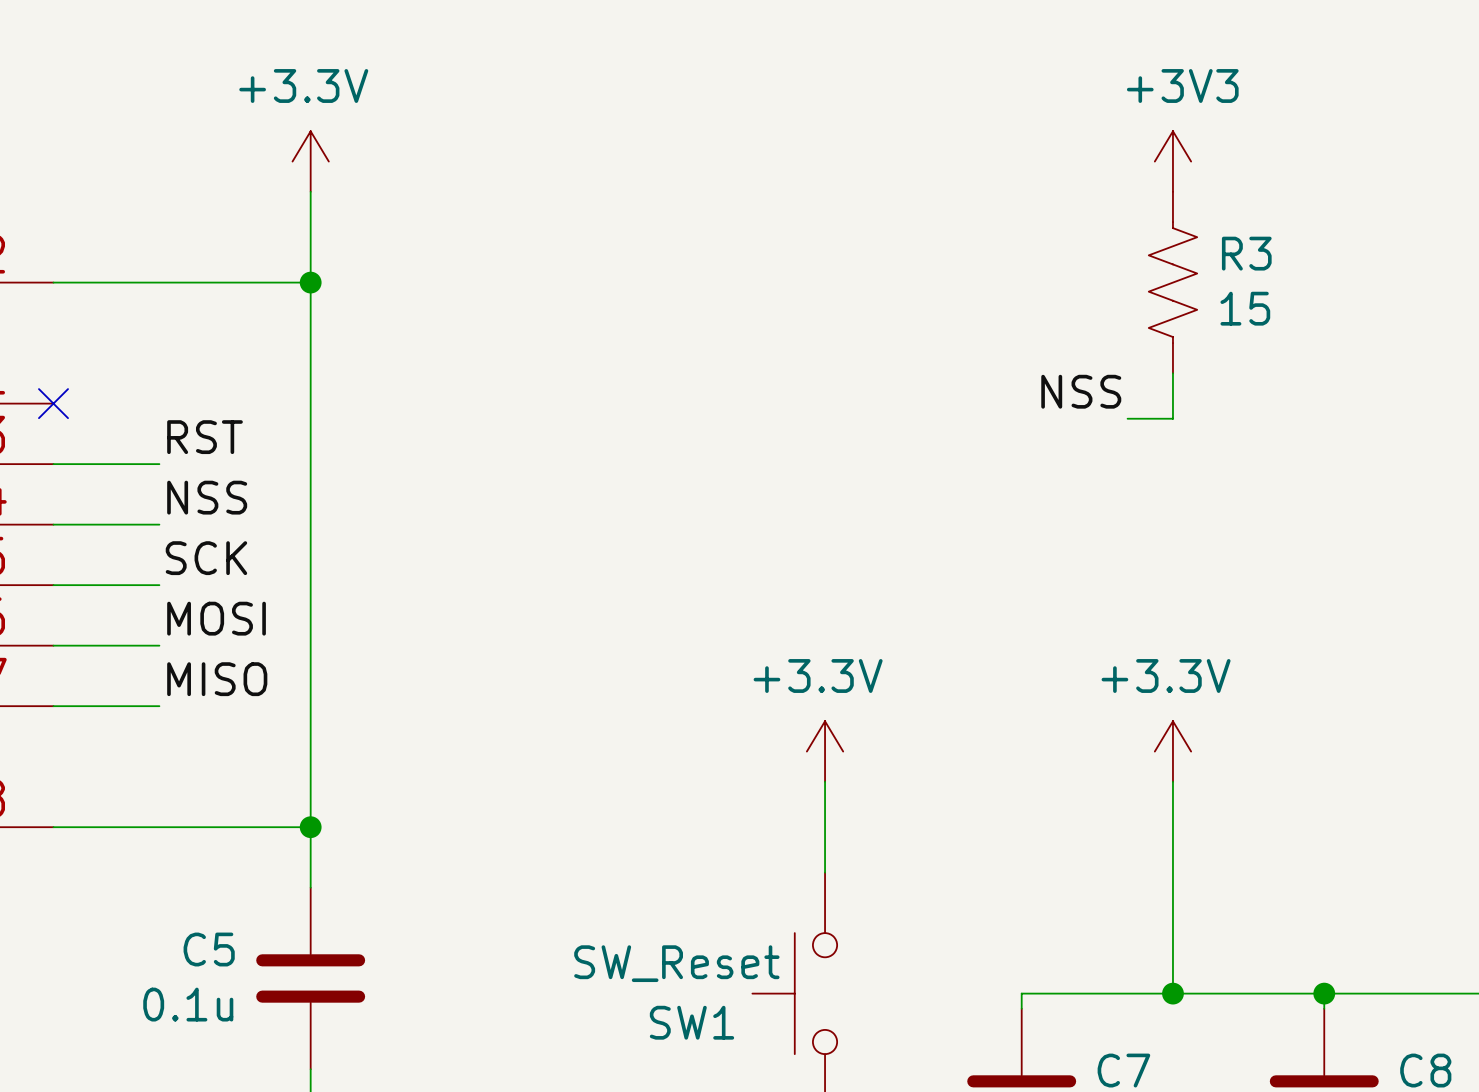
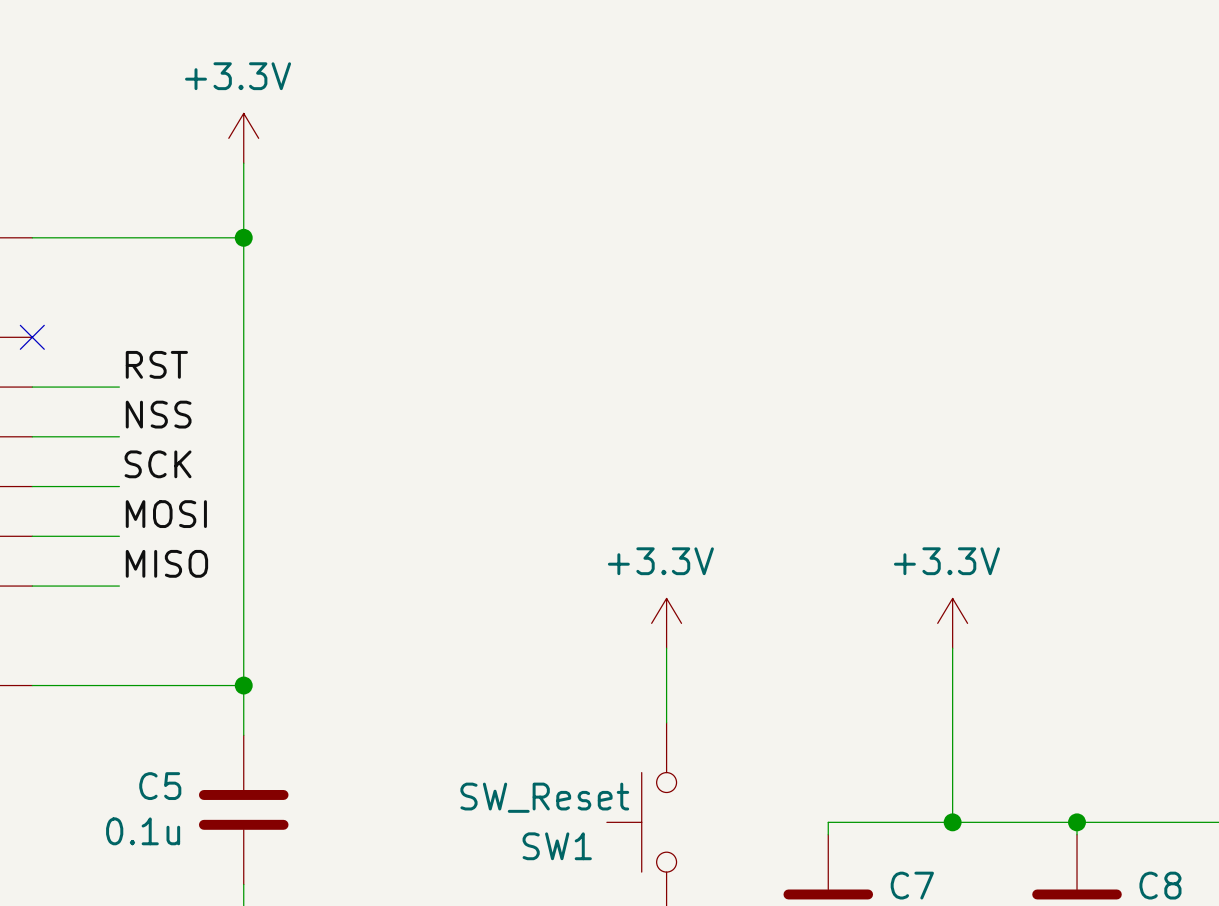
power symbol: +3V3 (1172, 161) -> none
R3: 15 (1172, 282) -> none
wire: (1172, 373) (1172, 418) (1127, 418) -> none
label: NSS (1081, 391) -> none

